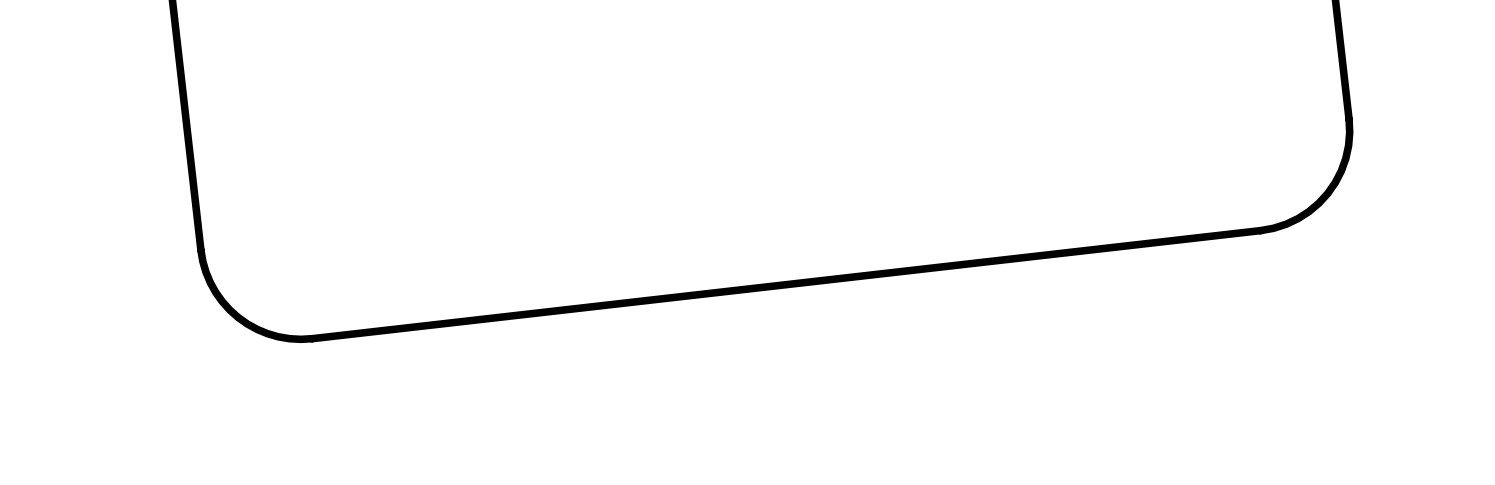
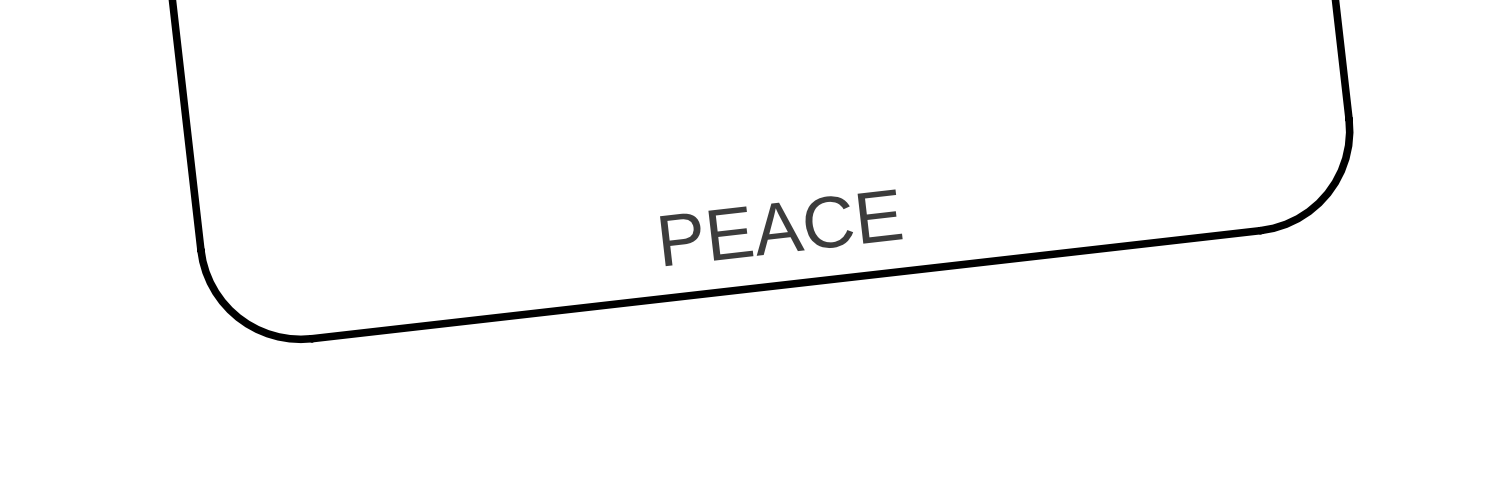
text: none -> PEACE (781, 227)

